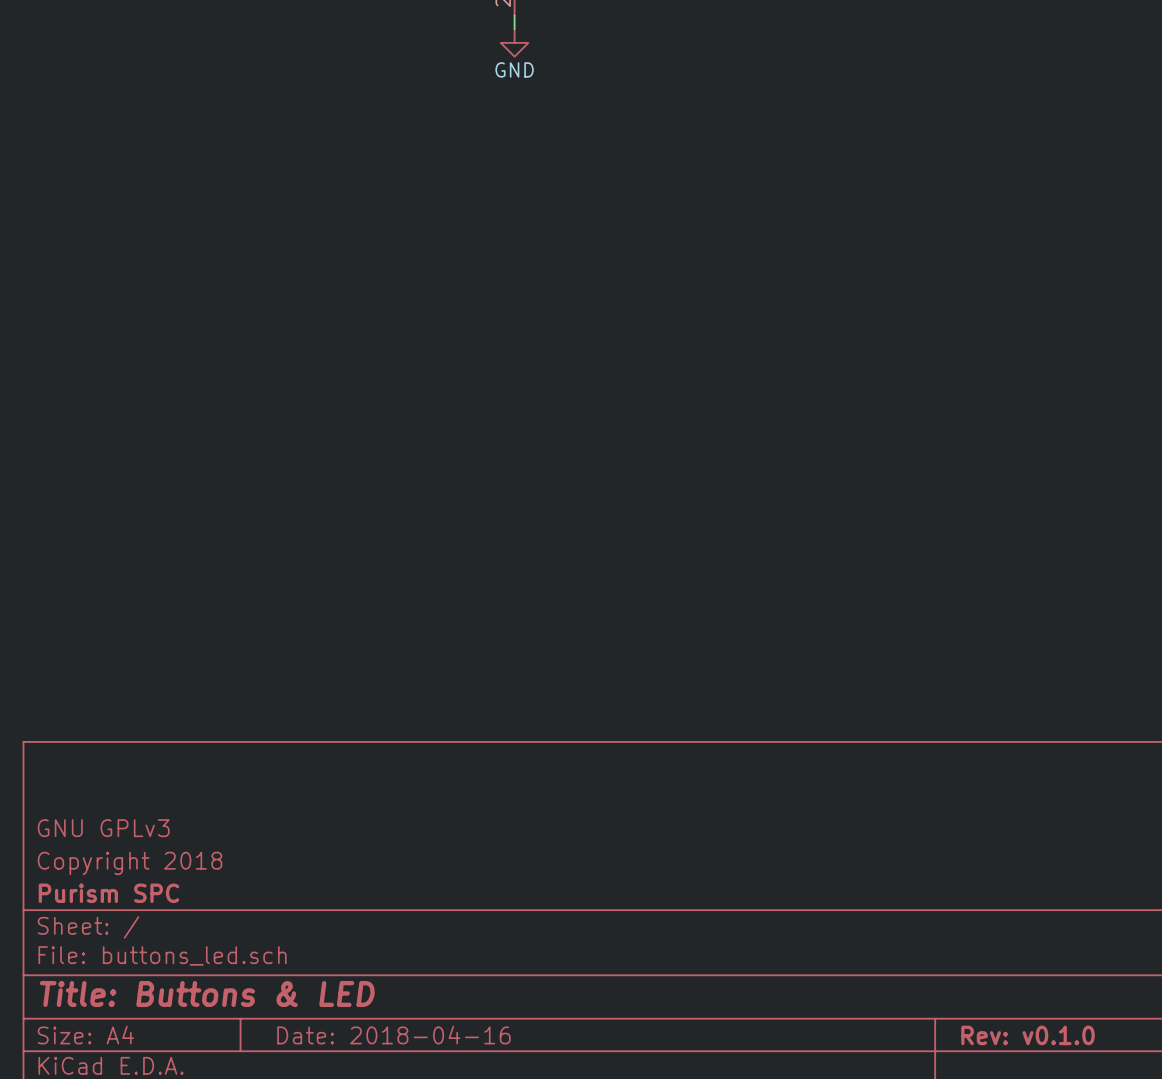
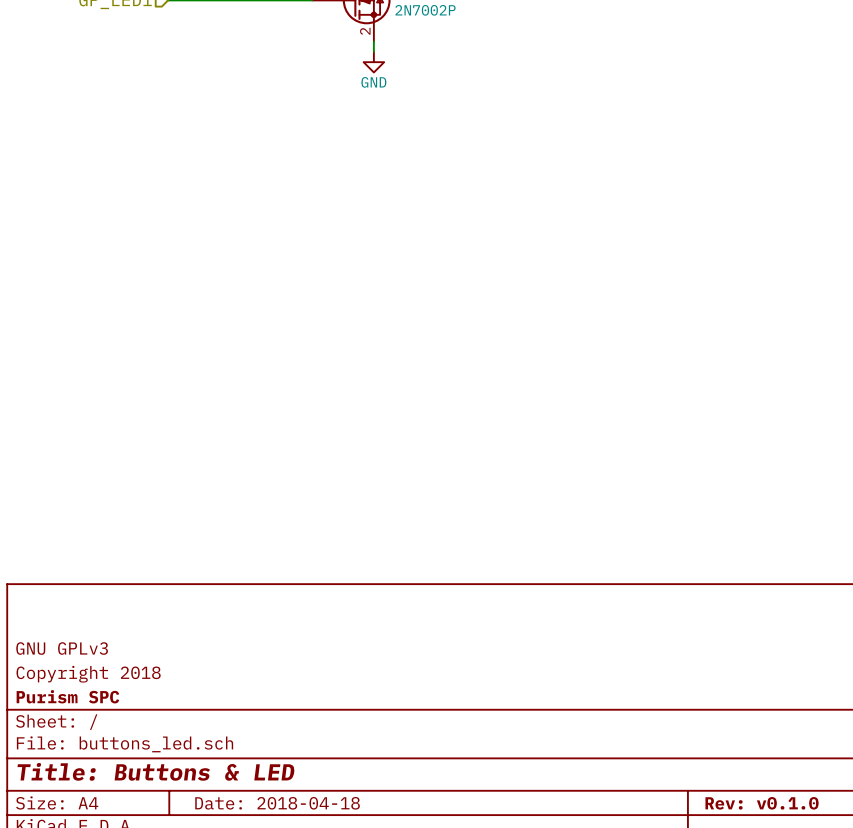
title block: Date: 2018-04-16 (393, 1035) -> Date: 2018-04-18 (277, 803)

